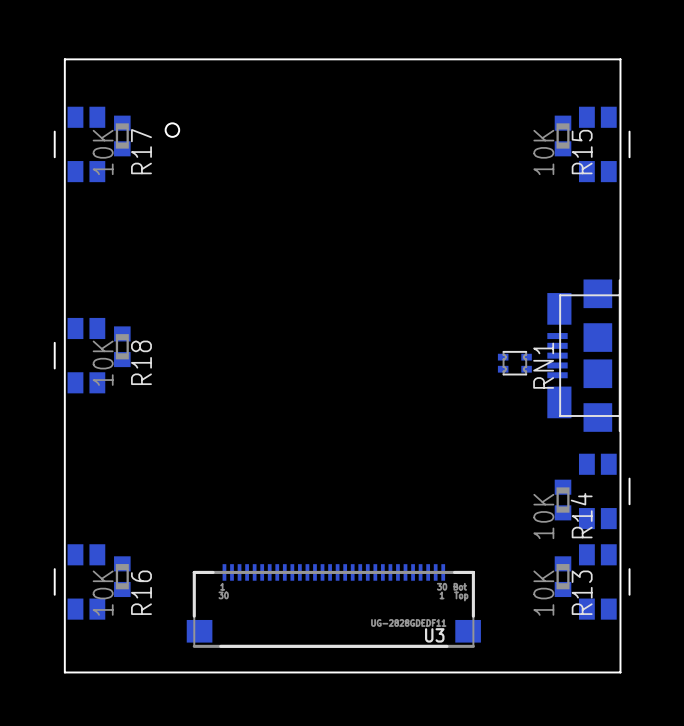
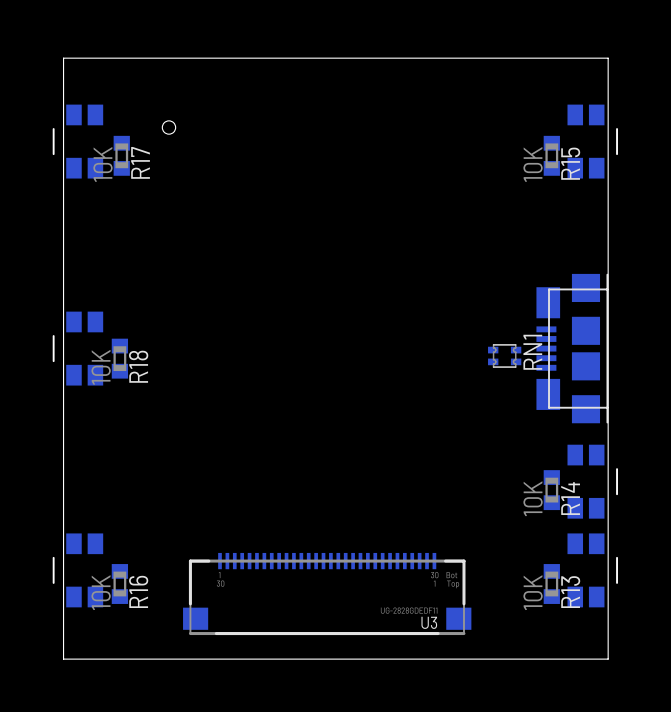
R17 position: (122, 135) -> (121, 155)
R15 position: (563, 135) -> (551, 155)
R18 position: (122, 346) -> (119, 358)
R16 position: (122, 576) -> (119, 584)
R13 position: (563, 576) -> (551, 584)

